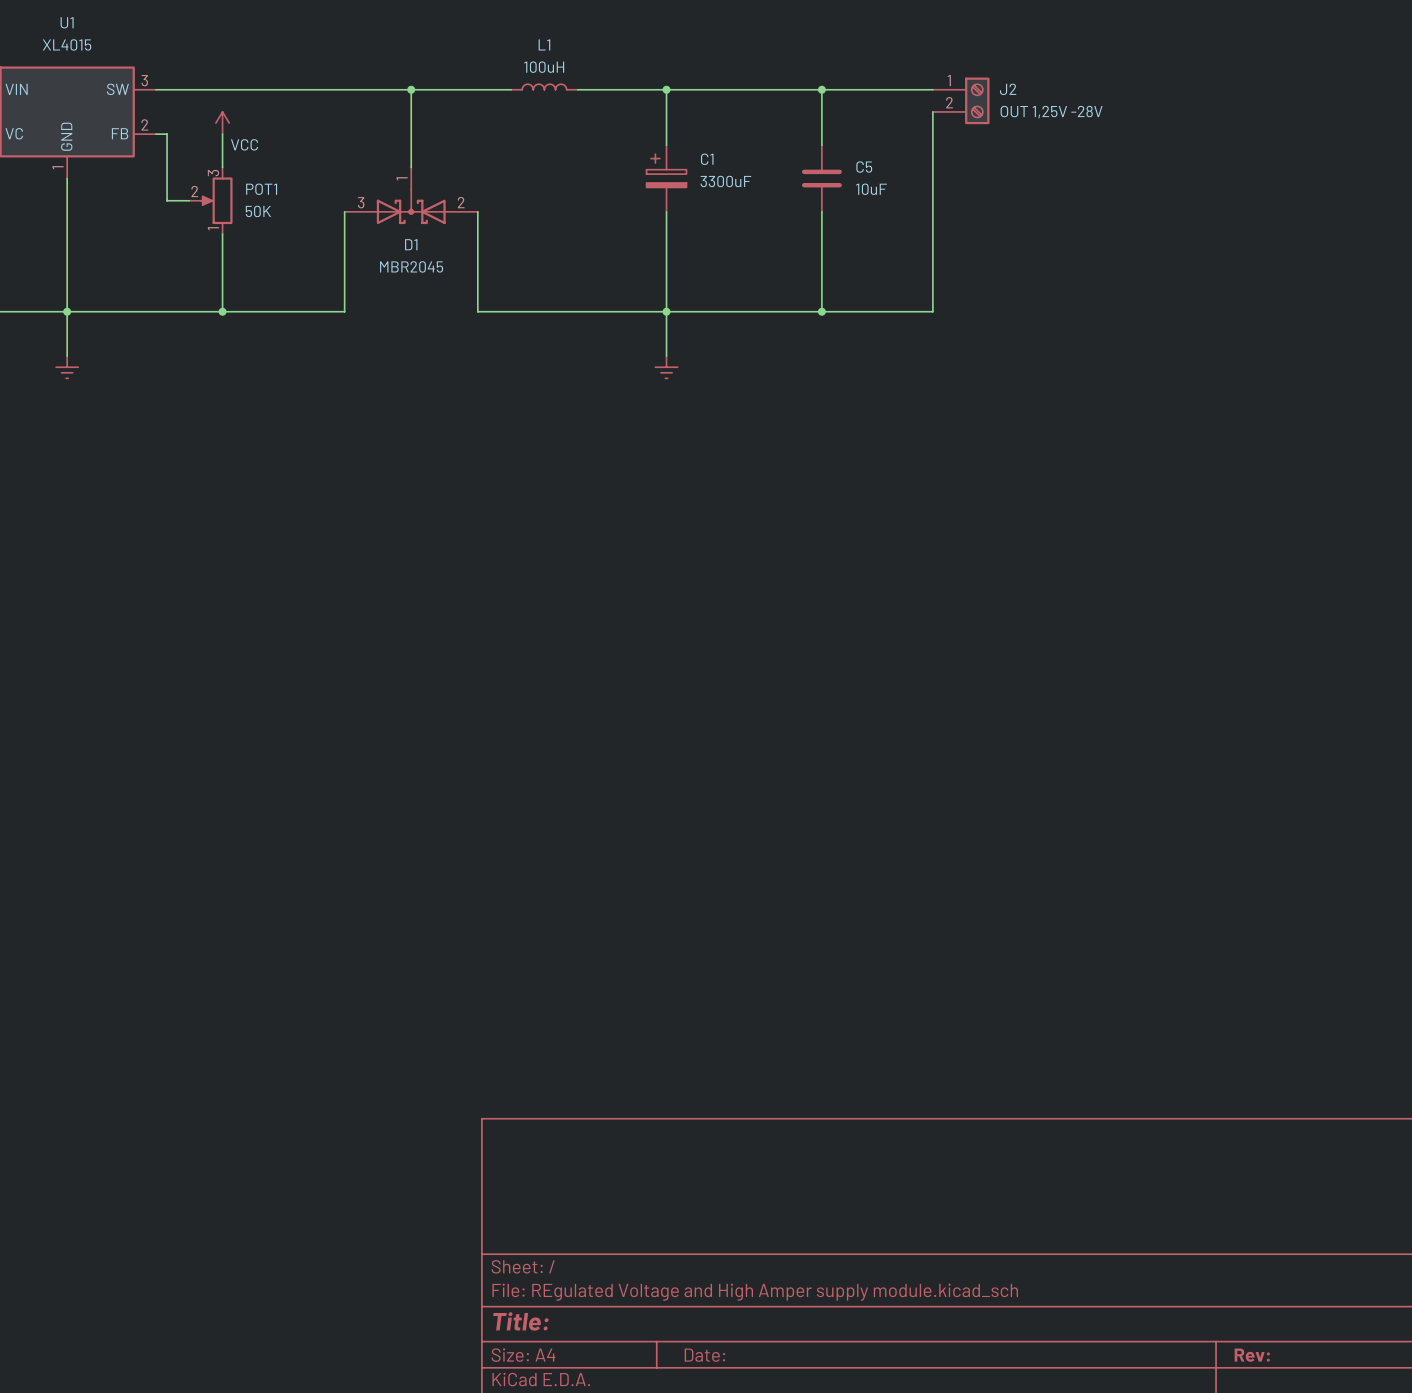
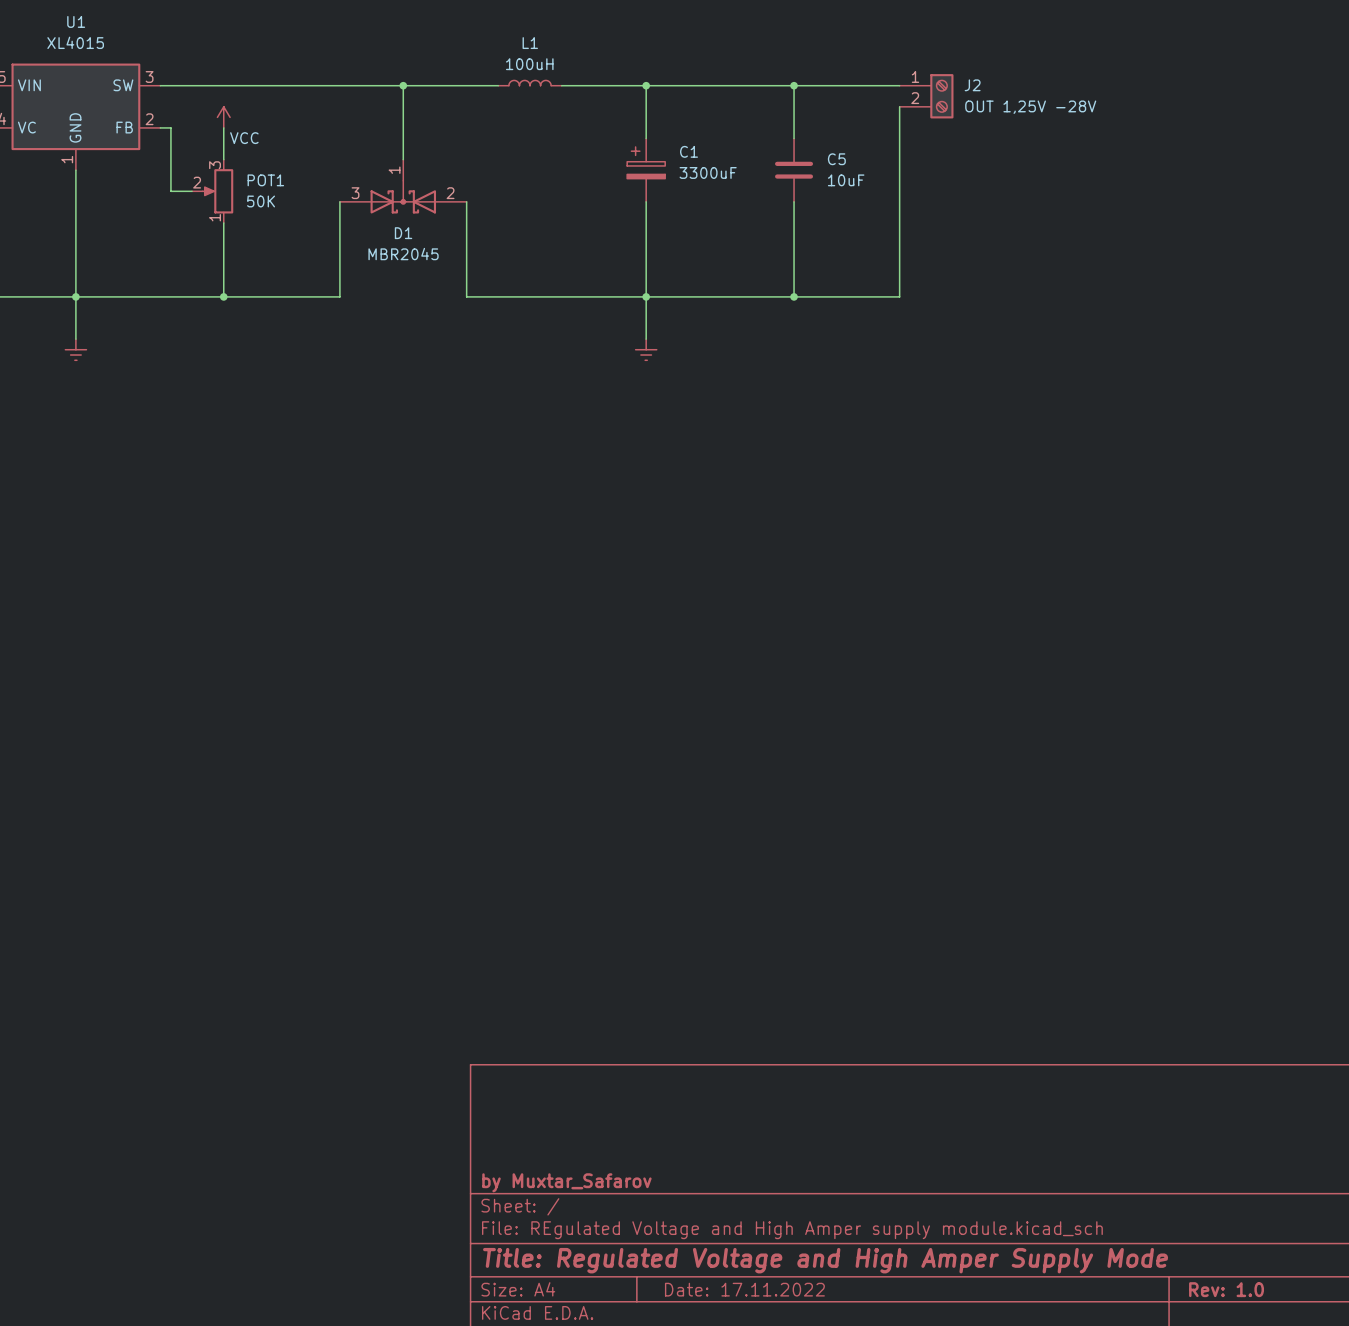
title block: none -> by Muxtar_Safarov (566, 1182)
title block: Title: (520, 1321) -> Title: Regulated Voltage and High Amper Supply Mode (825, 1260)
title block: Date: (704, 1355) -> Date: 17.11.2022 (744, 1289)
title block: Rev: (1252, 1355) -> Rev: 1.0 (1226, 1289)

